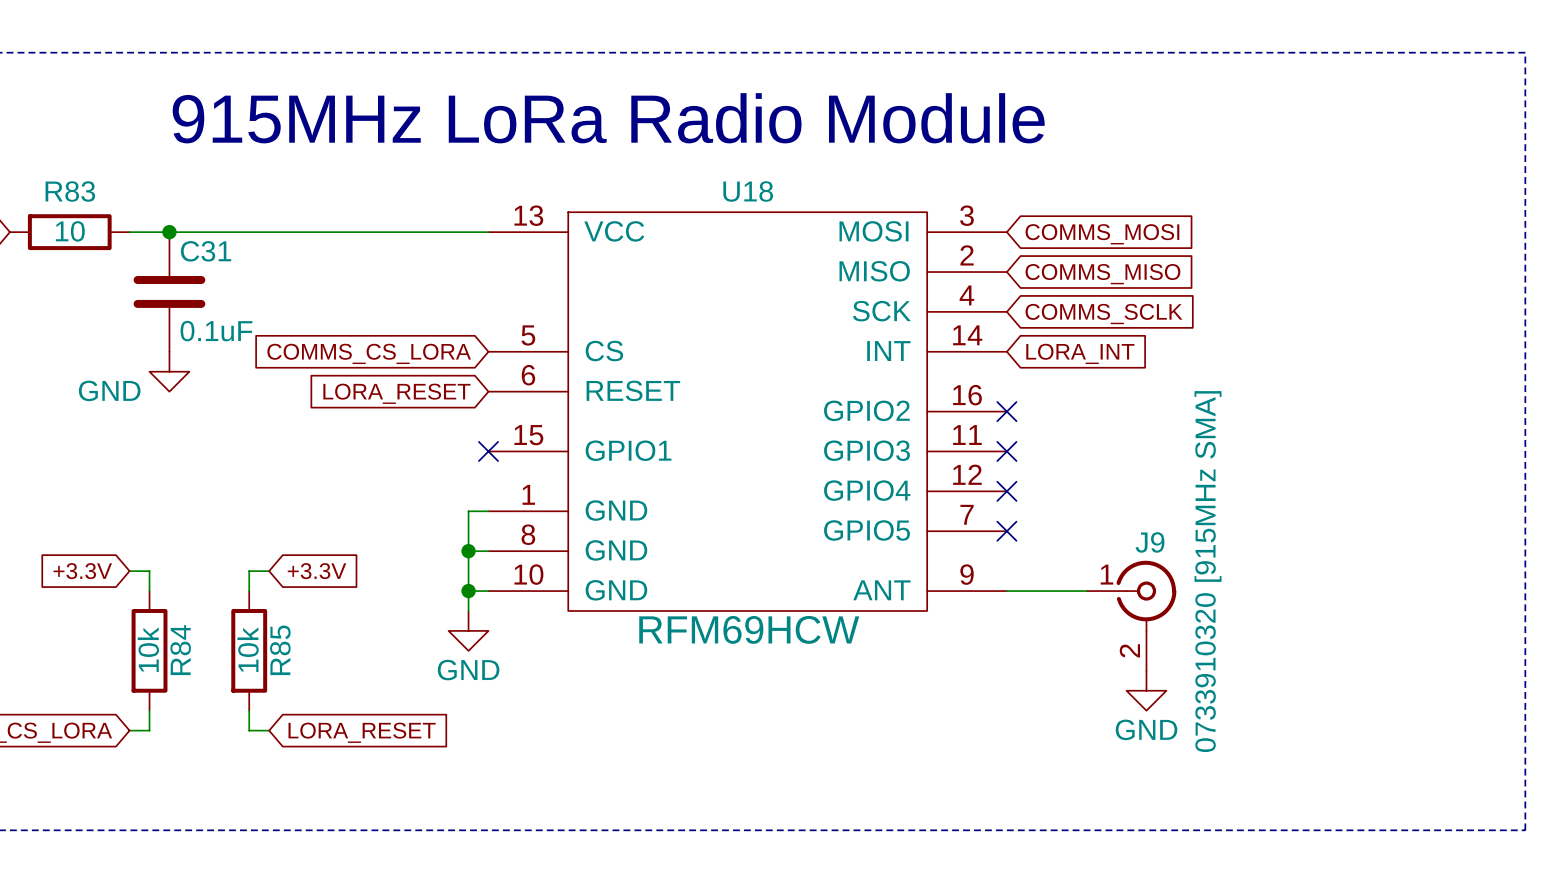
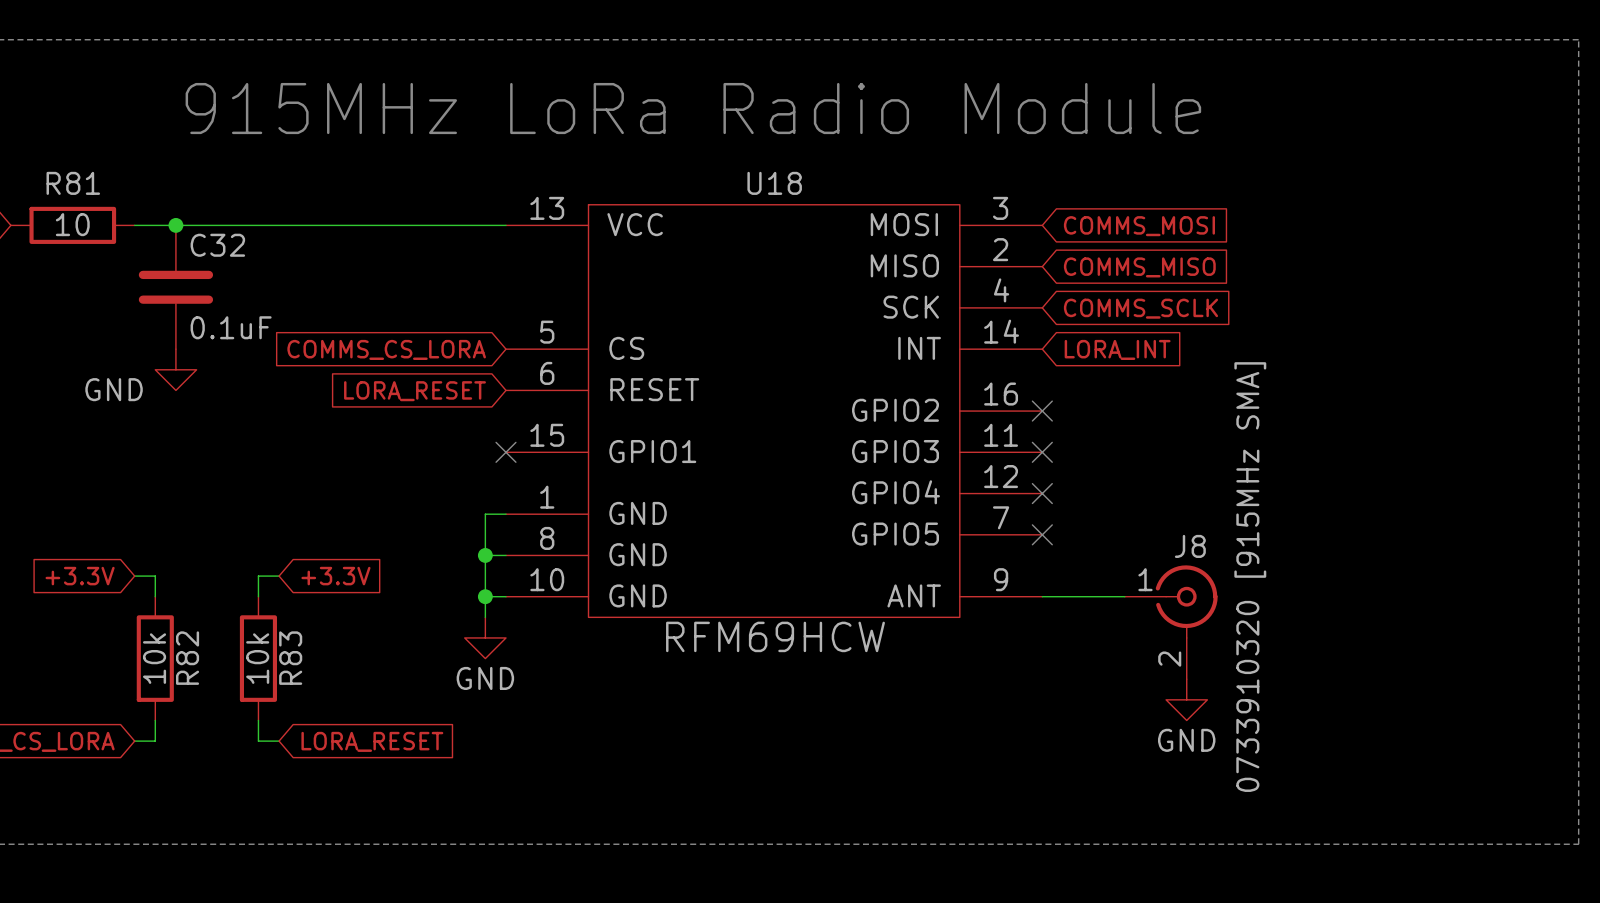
R83 name: R83 (70, 191) -> R81 (73, 183)
C31 name: C31 (206, 251) -> C32 (217, 245)
J9 name: J9 (1150, 542) -> J8 (1190, 546)
R84 name: R84 (180, 650) -> R82 (187, 658)
R85 name: R85 (280, 650) -> R83 (290, 658)

